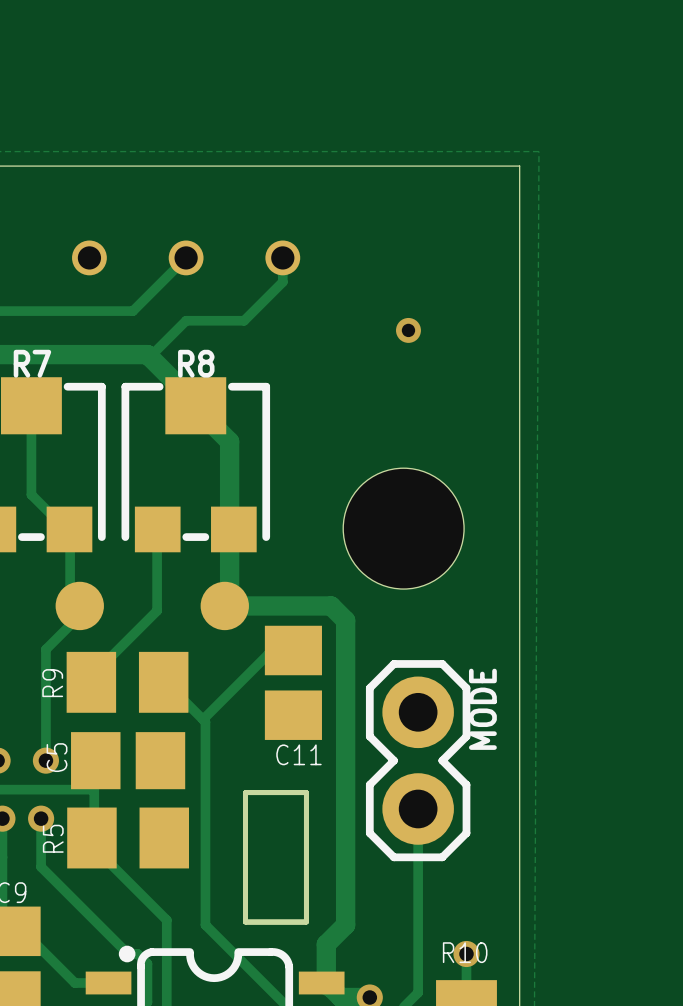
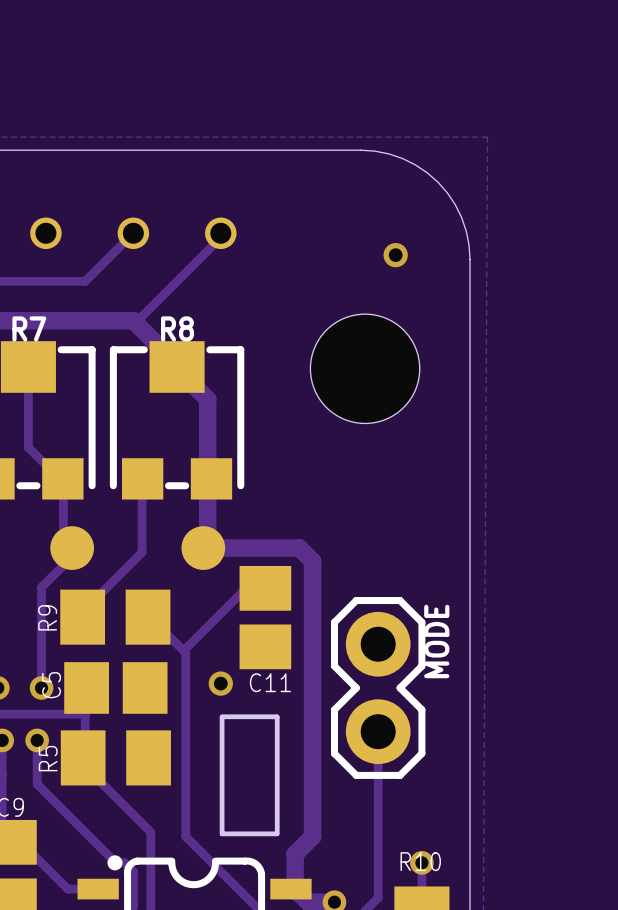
board edge: (398, 166) (519, 166) (519, 286) -> (360, 150) (388, 153) (402, 158) (415, 164) (437, 182) (455, 204) (461, 217) (466, 231) (470, 259)
track: (186, 257) (132, 311) (94, 311) -> (133, 233) (85, 281)
part position: (186, 257) -> (133, 233)
track: (282, 257) (282, 282) (244, 320) (186, 320) -> (220, 233) (220, 237) (168, 290)
via: none -> (395, 255)
via: (408, 330) -> none
hole position: (403, 528) -> (365, 368)
via: none -> (220, 683)

